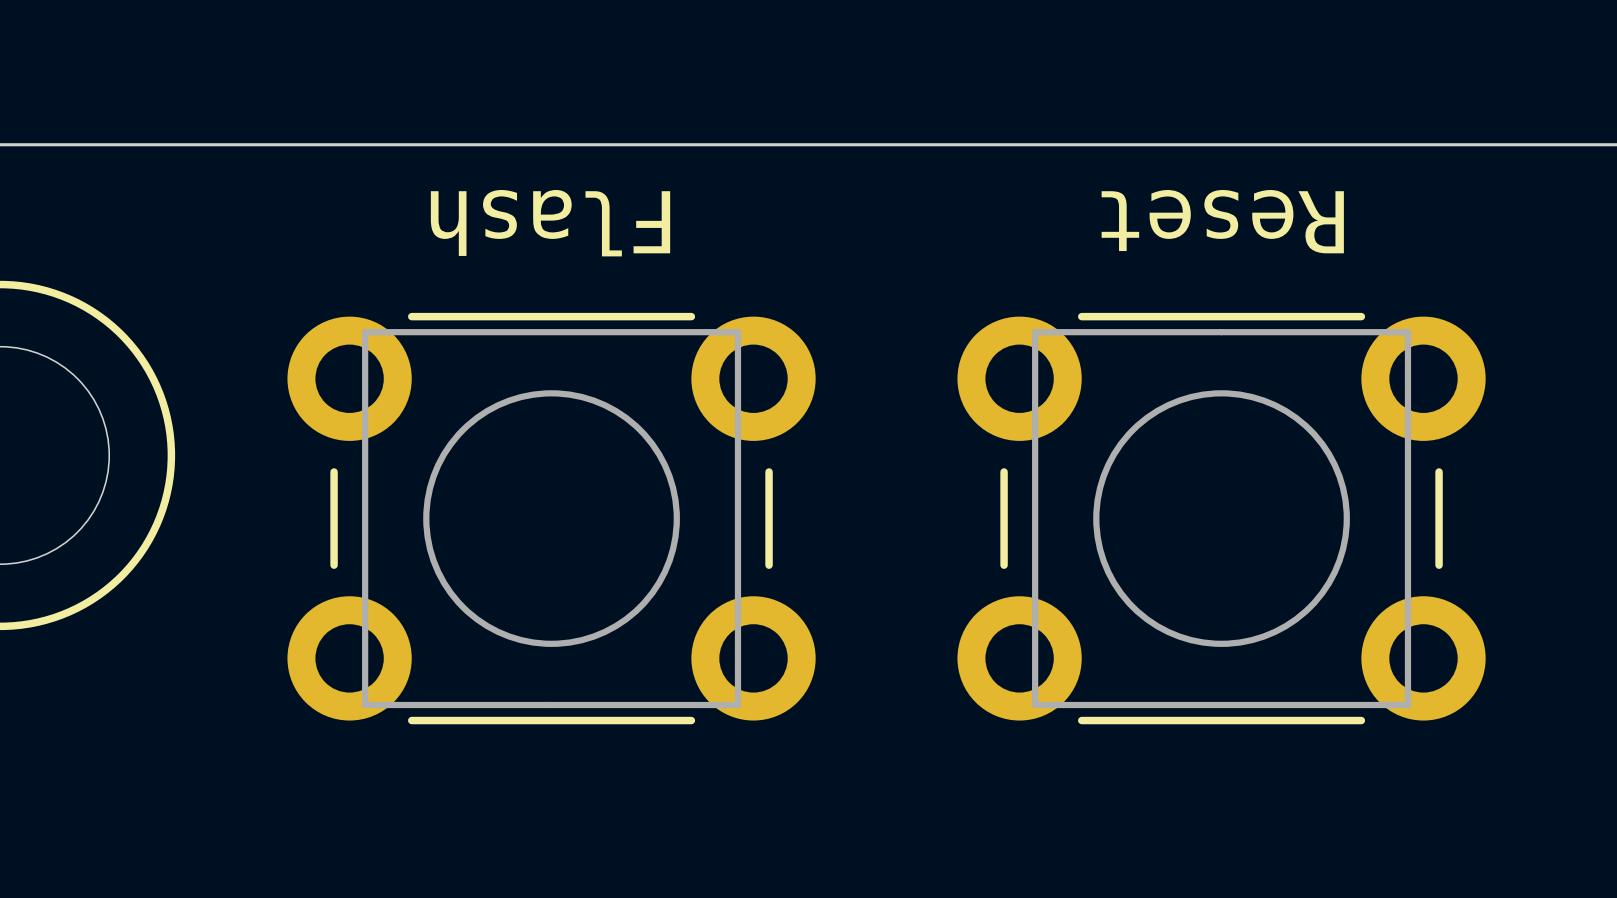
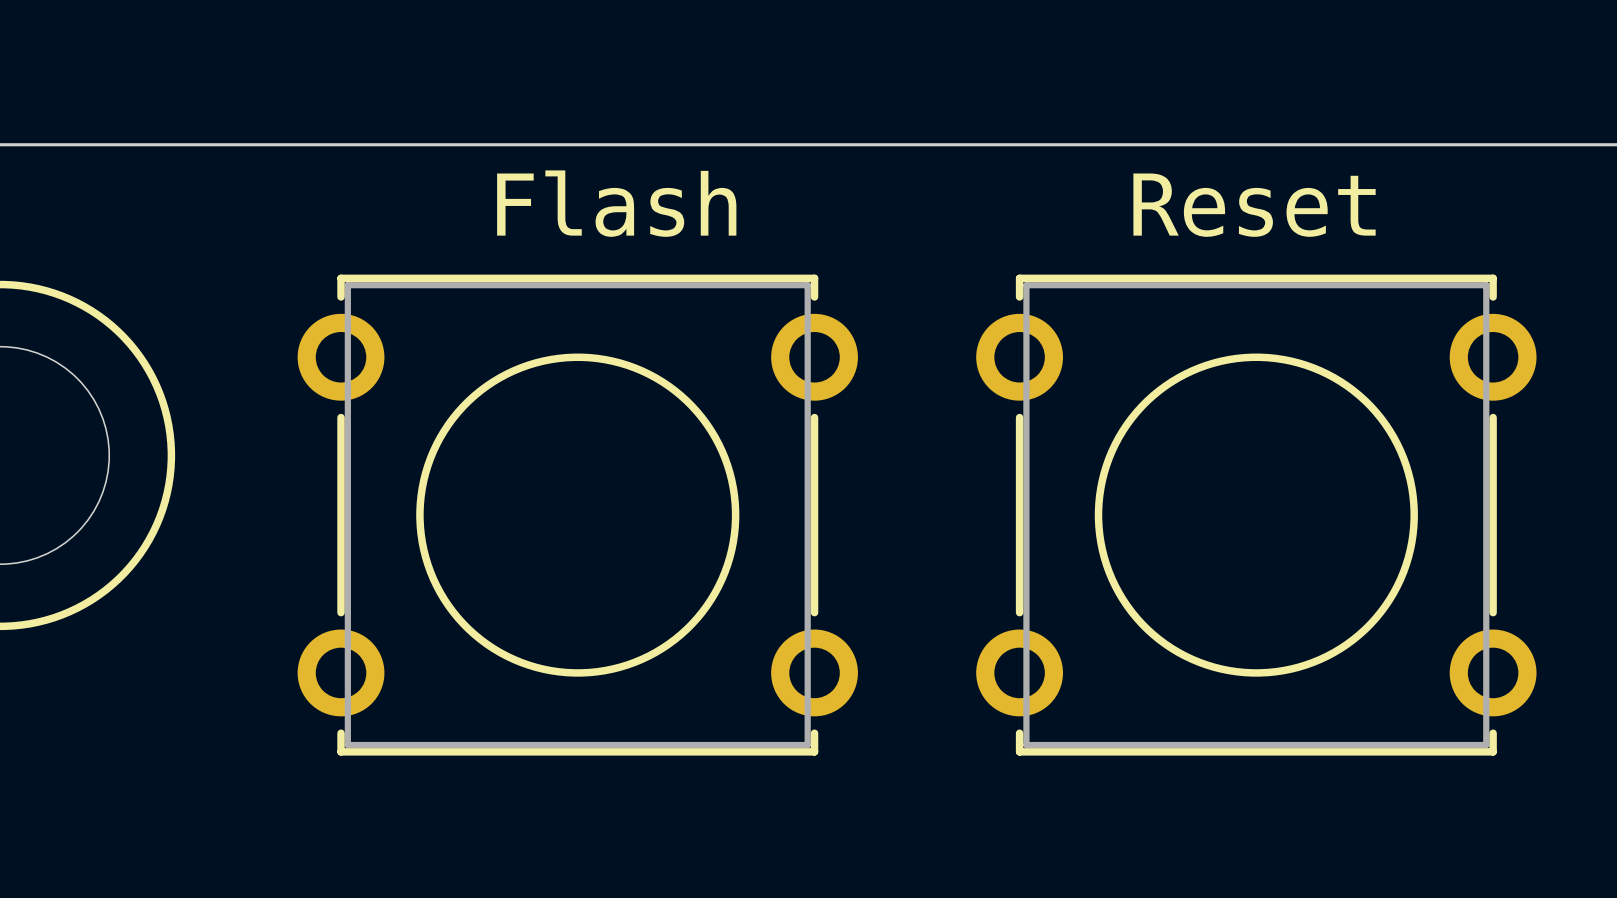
part footprint: [287, 312, 816, 725] -> [297, 274, 858, 756]
part footprint: [957, 312, 1486, 725] -> [976, 274, 1537, 756]

